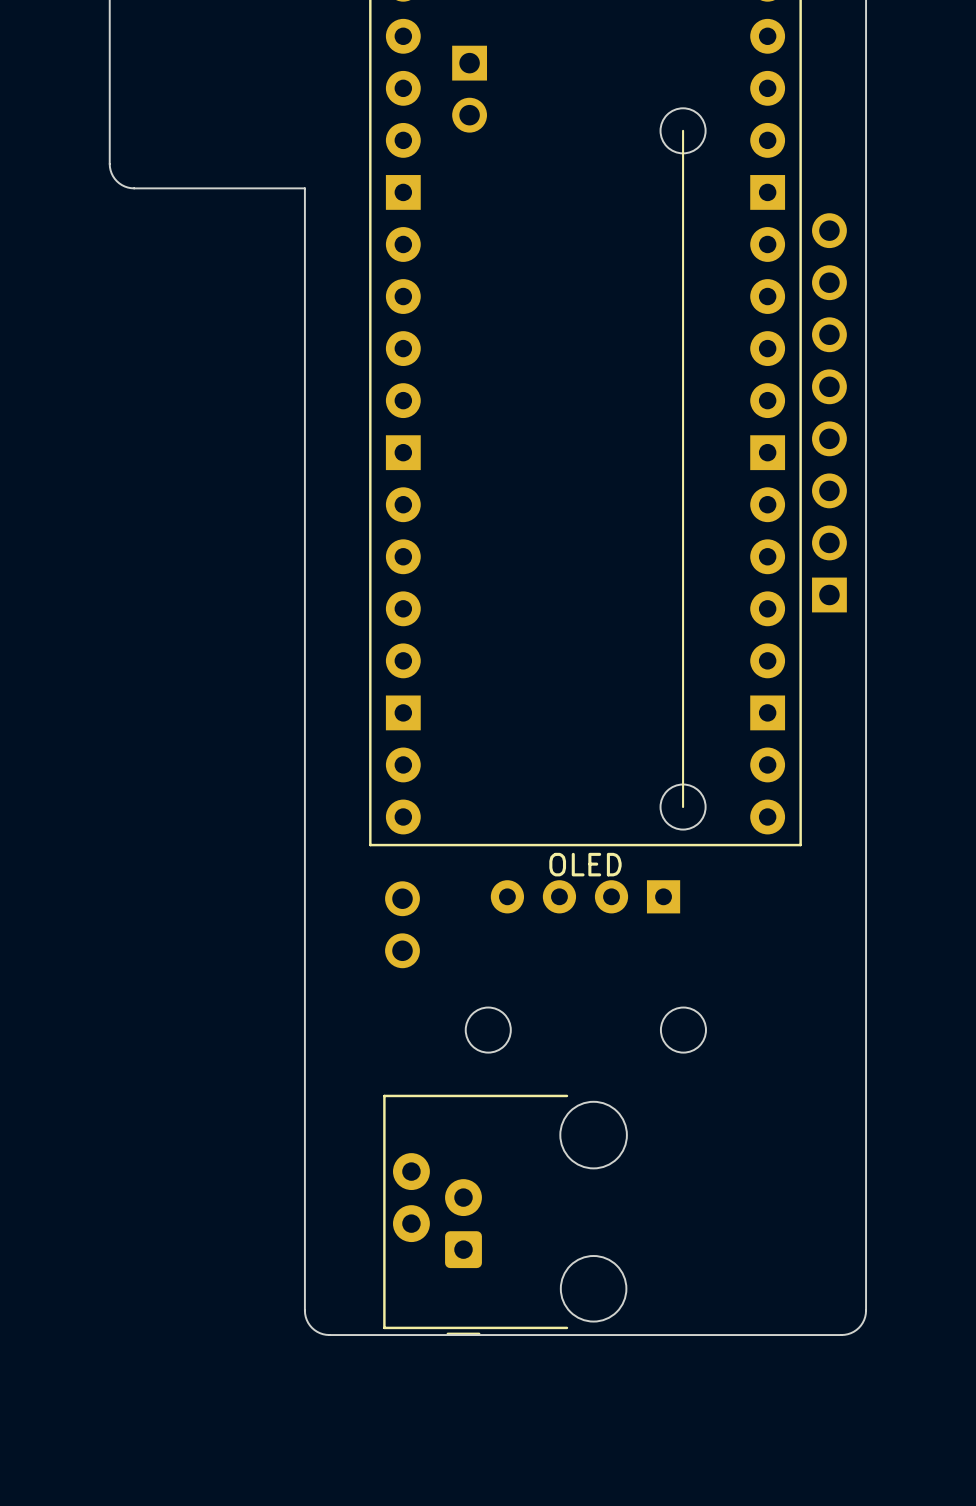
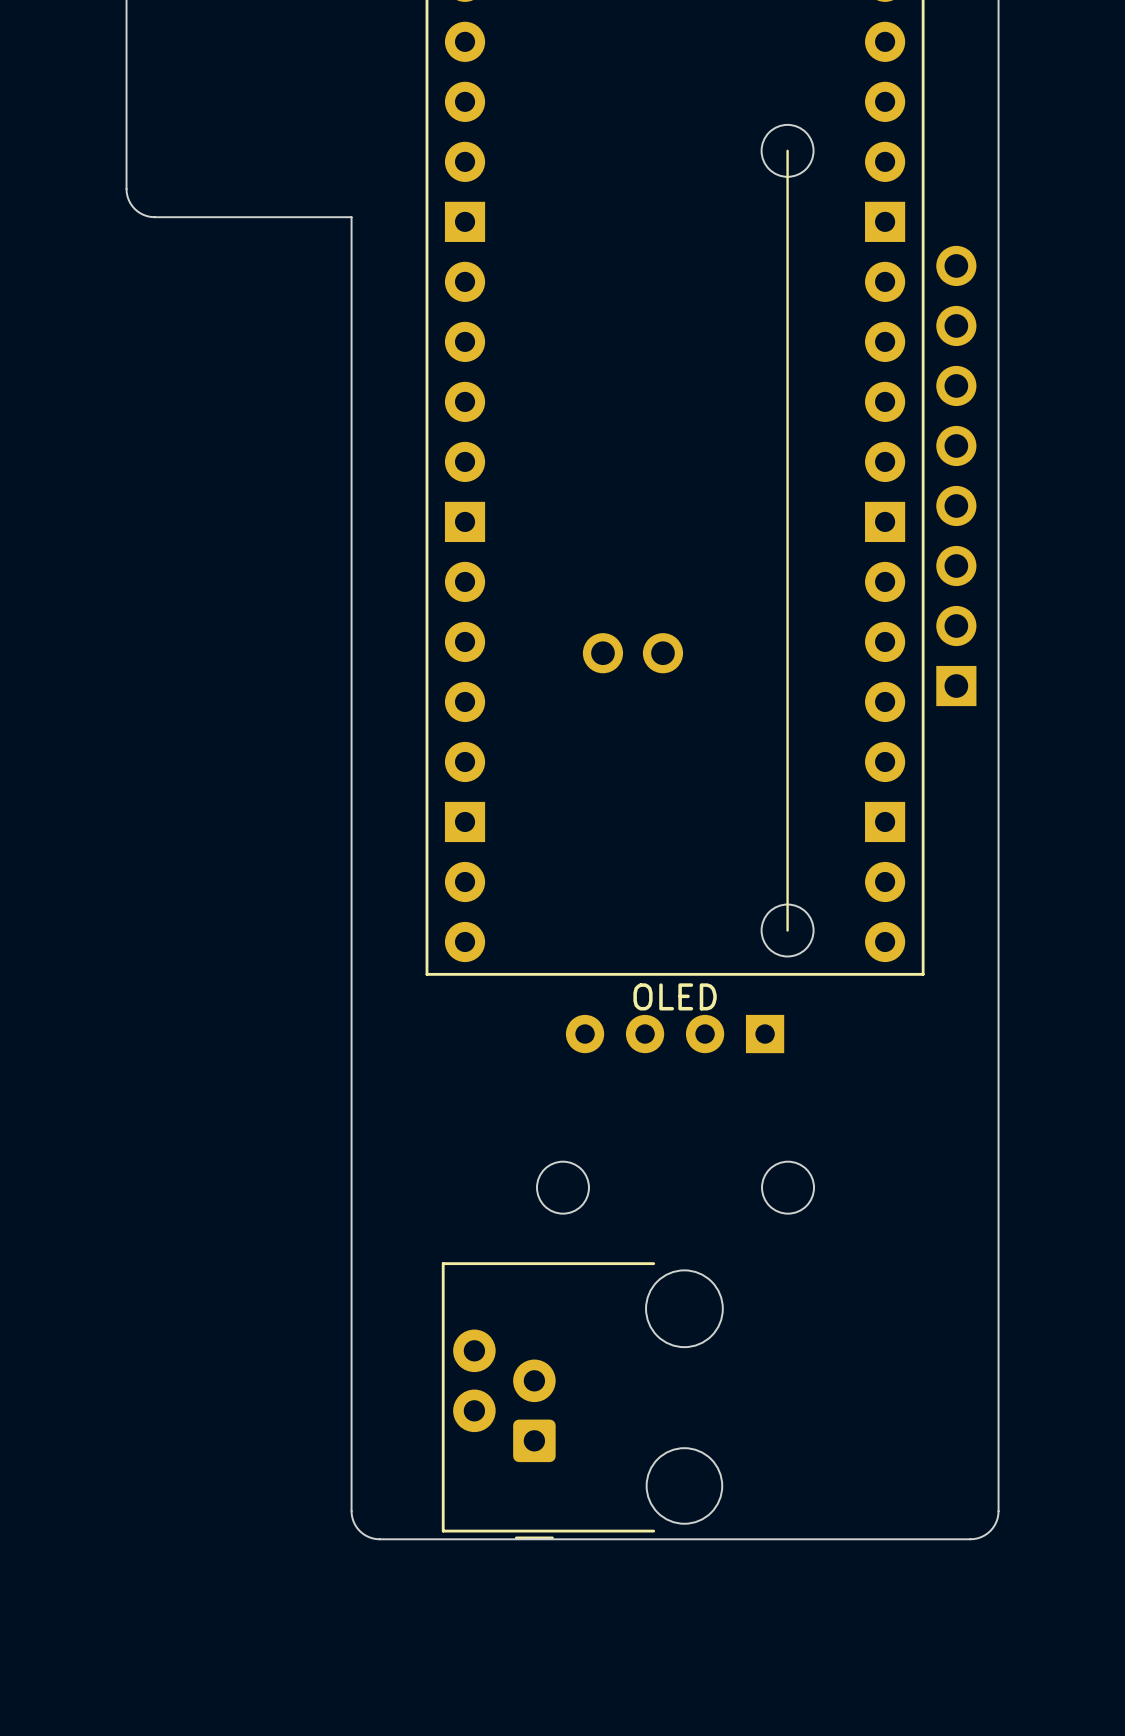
part: (469, 89) -> none
part rotation: 0° (402, 924) -> 90° clockwise (632, 653)
part position: (402, 924) -> (632, 653)

